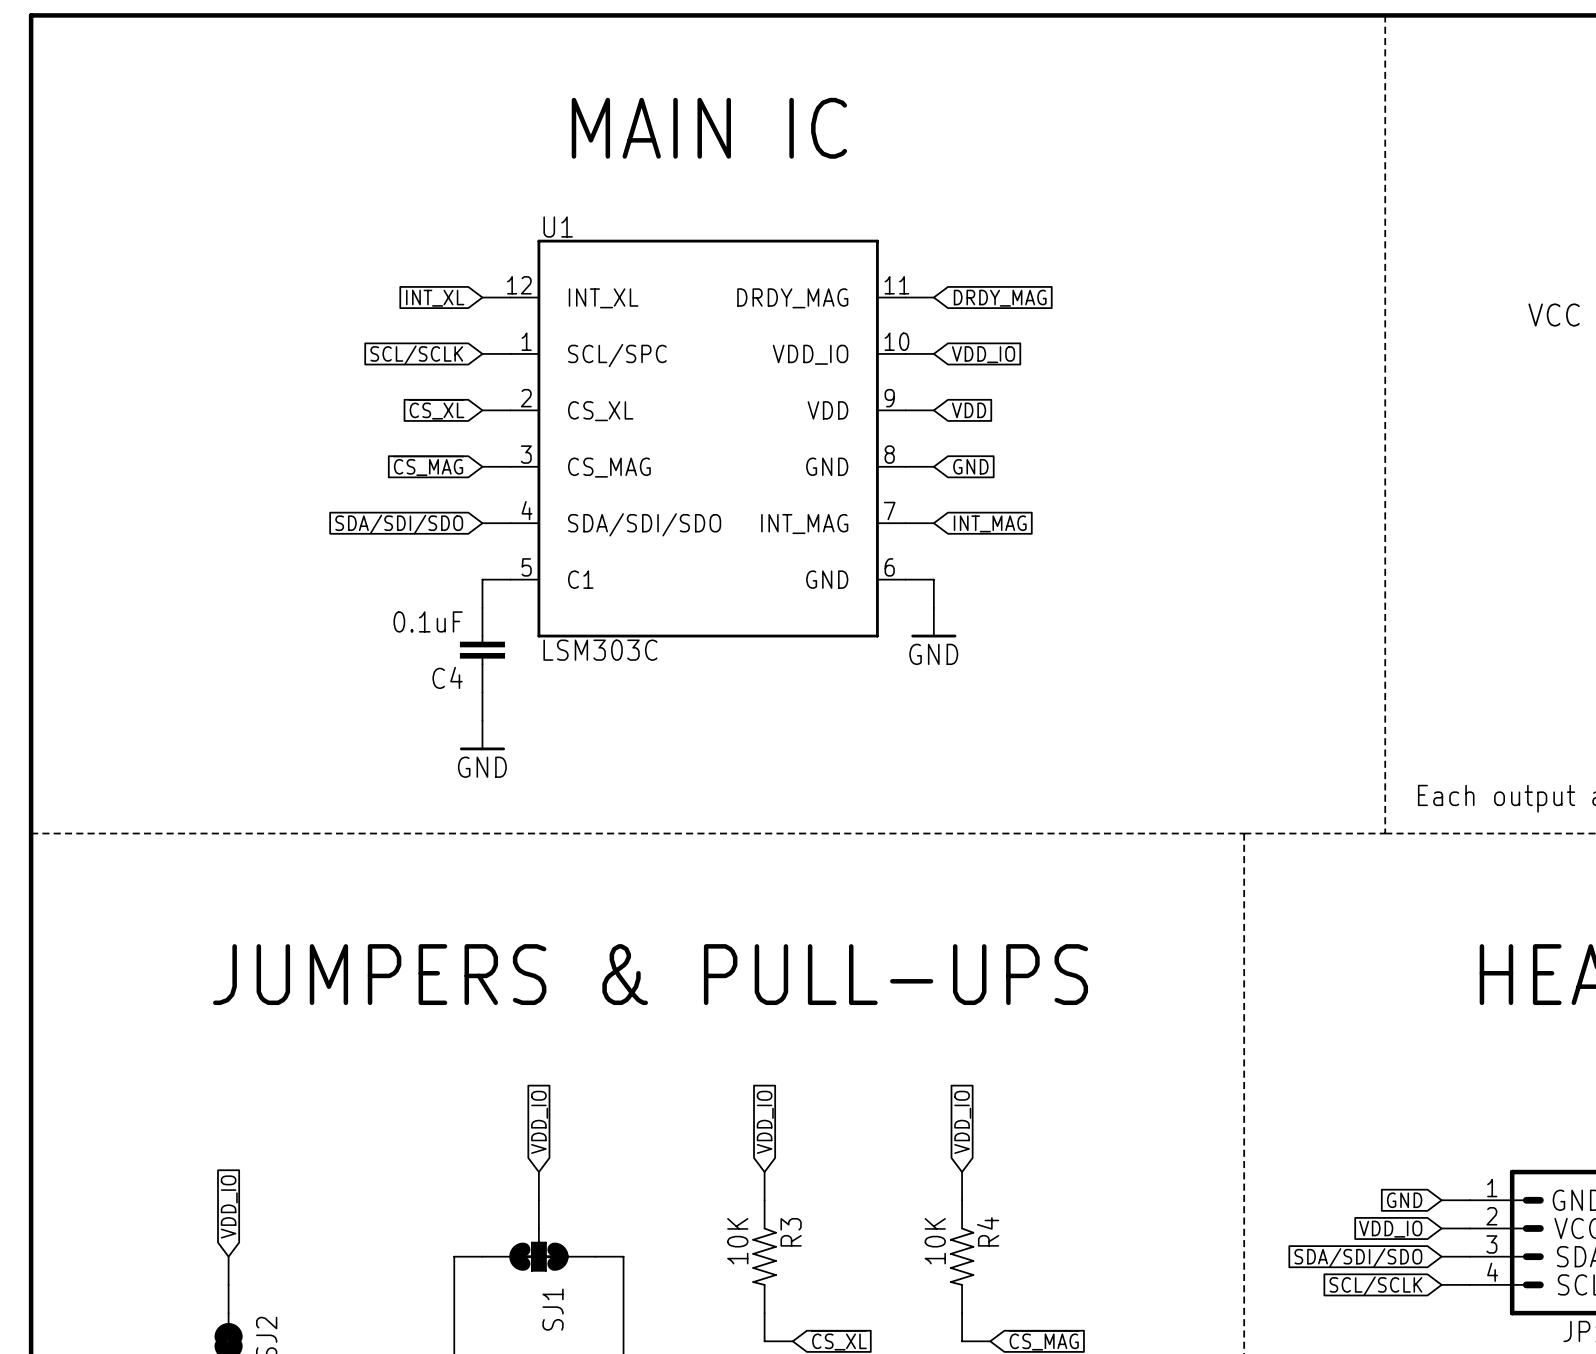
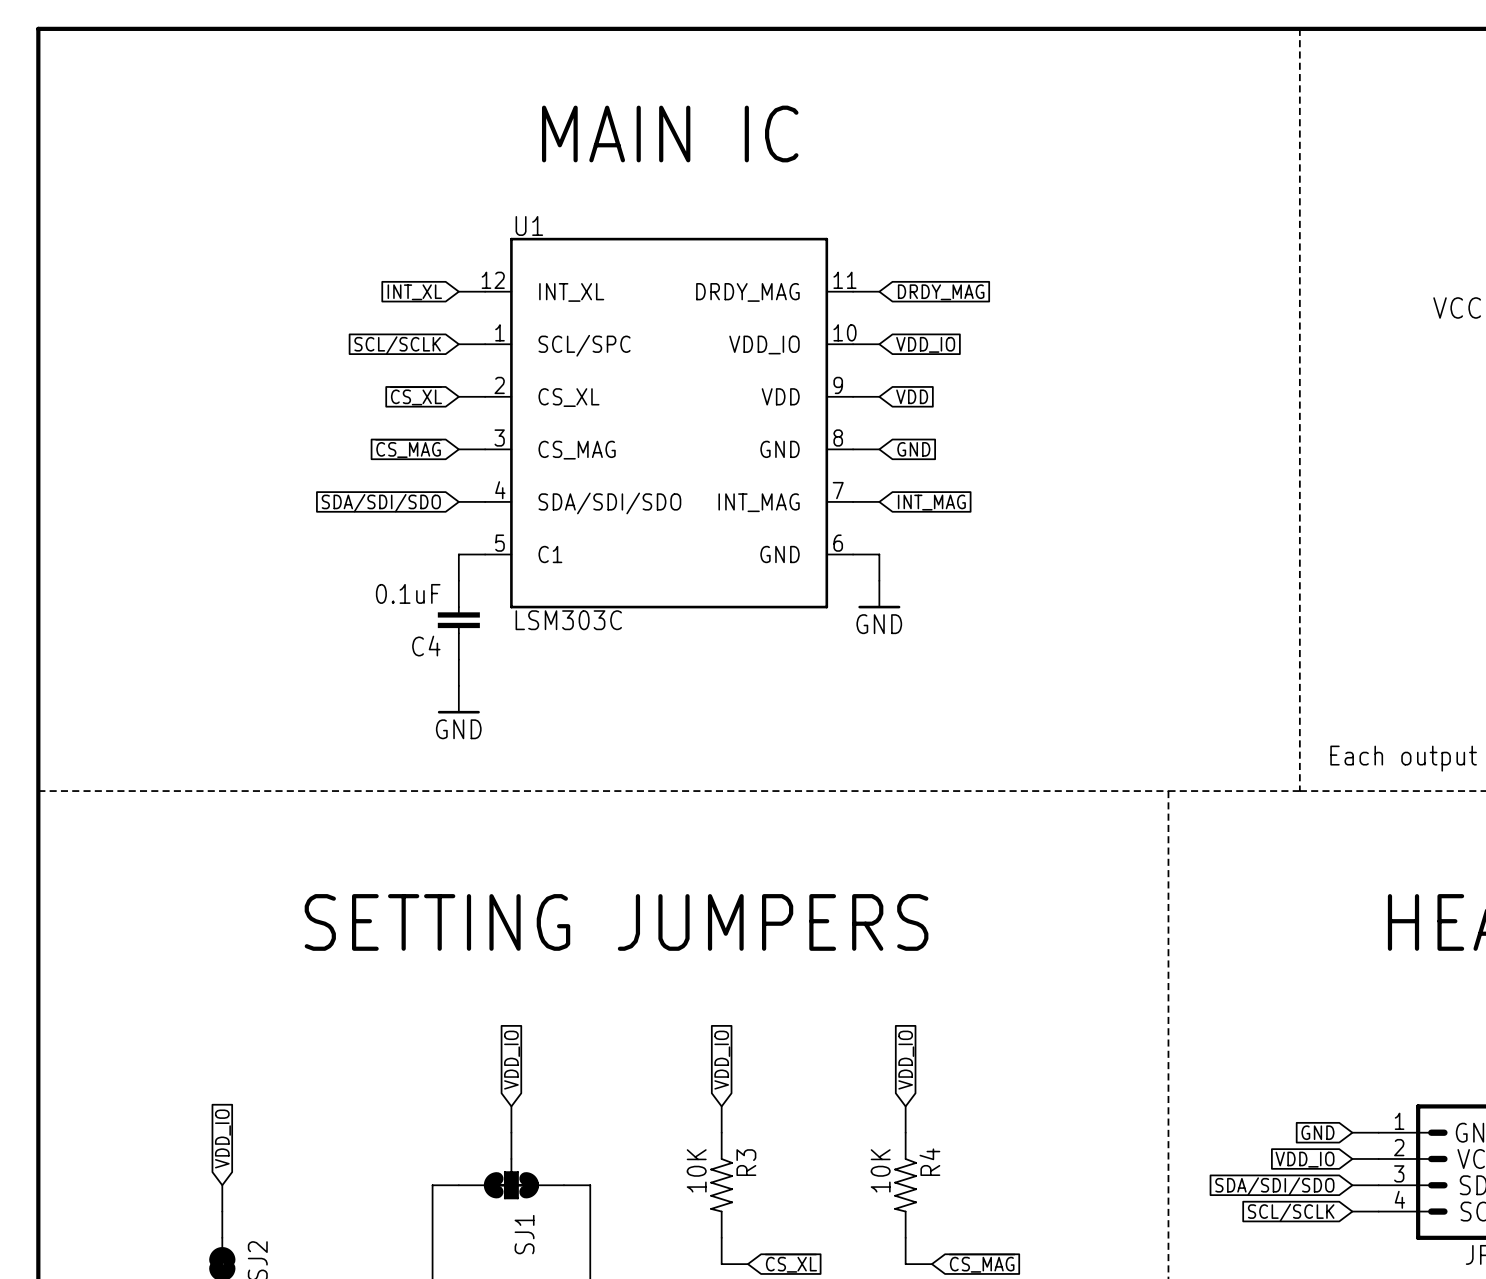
text: JUMPERS & PULL-UPS (650, 974) -> SETTING JUMPERS (616, 922)

